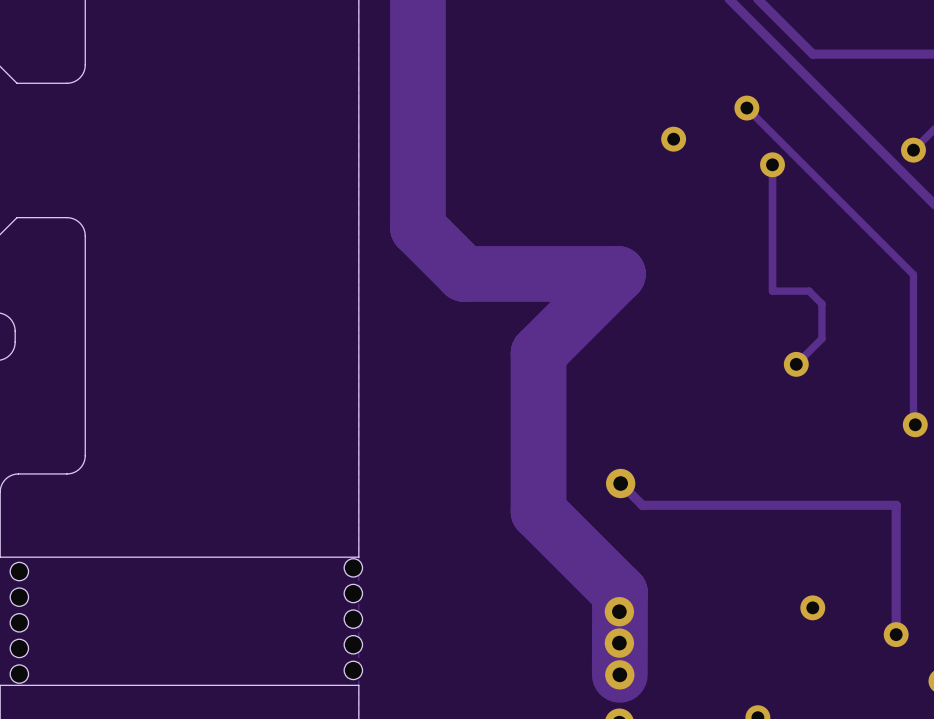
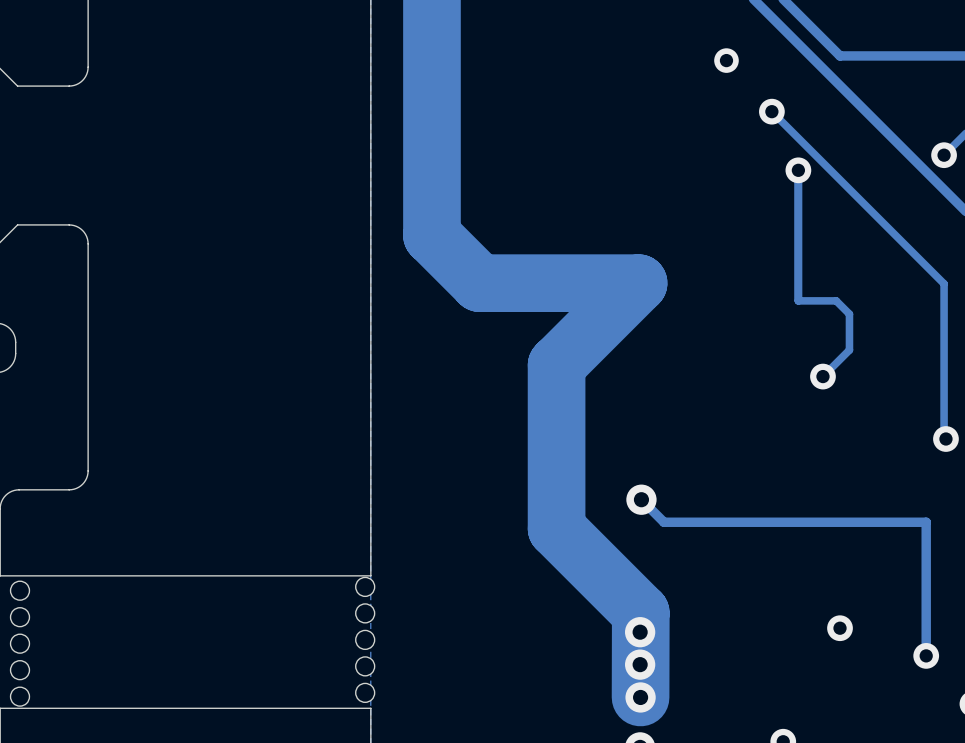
via: none -> (726, 60)
via: (673, 139) -> none

